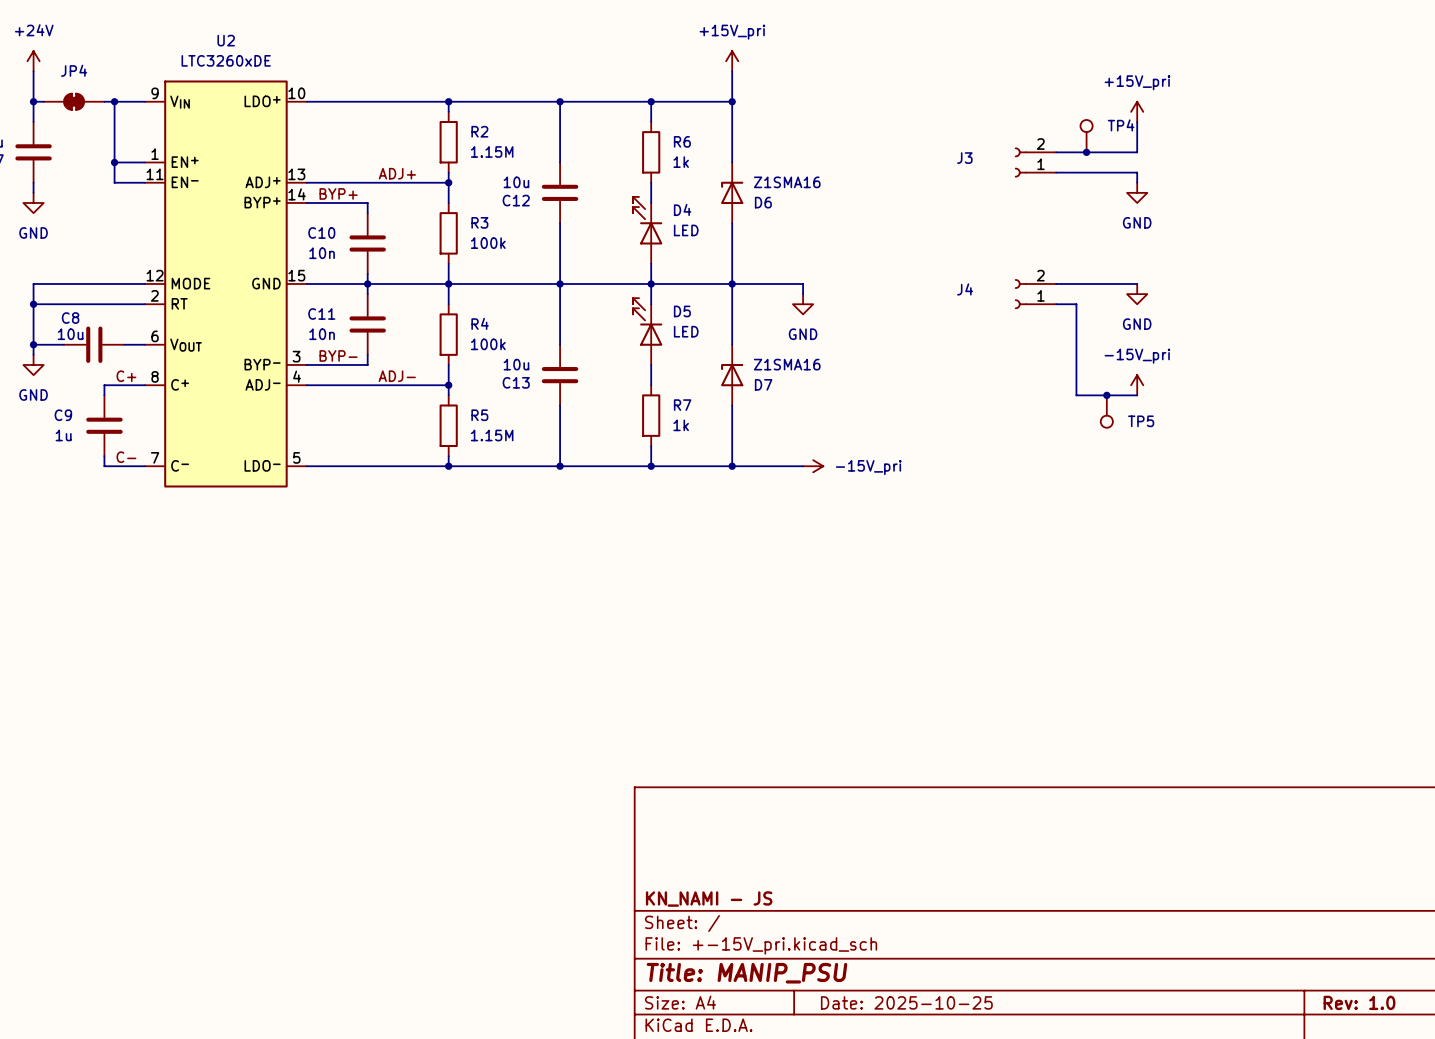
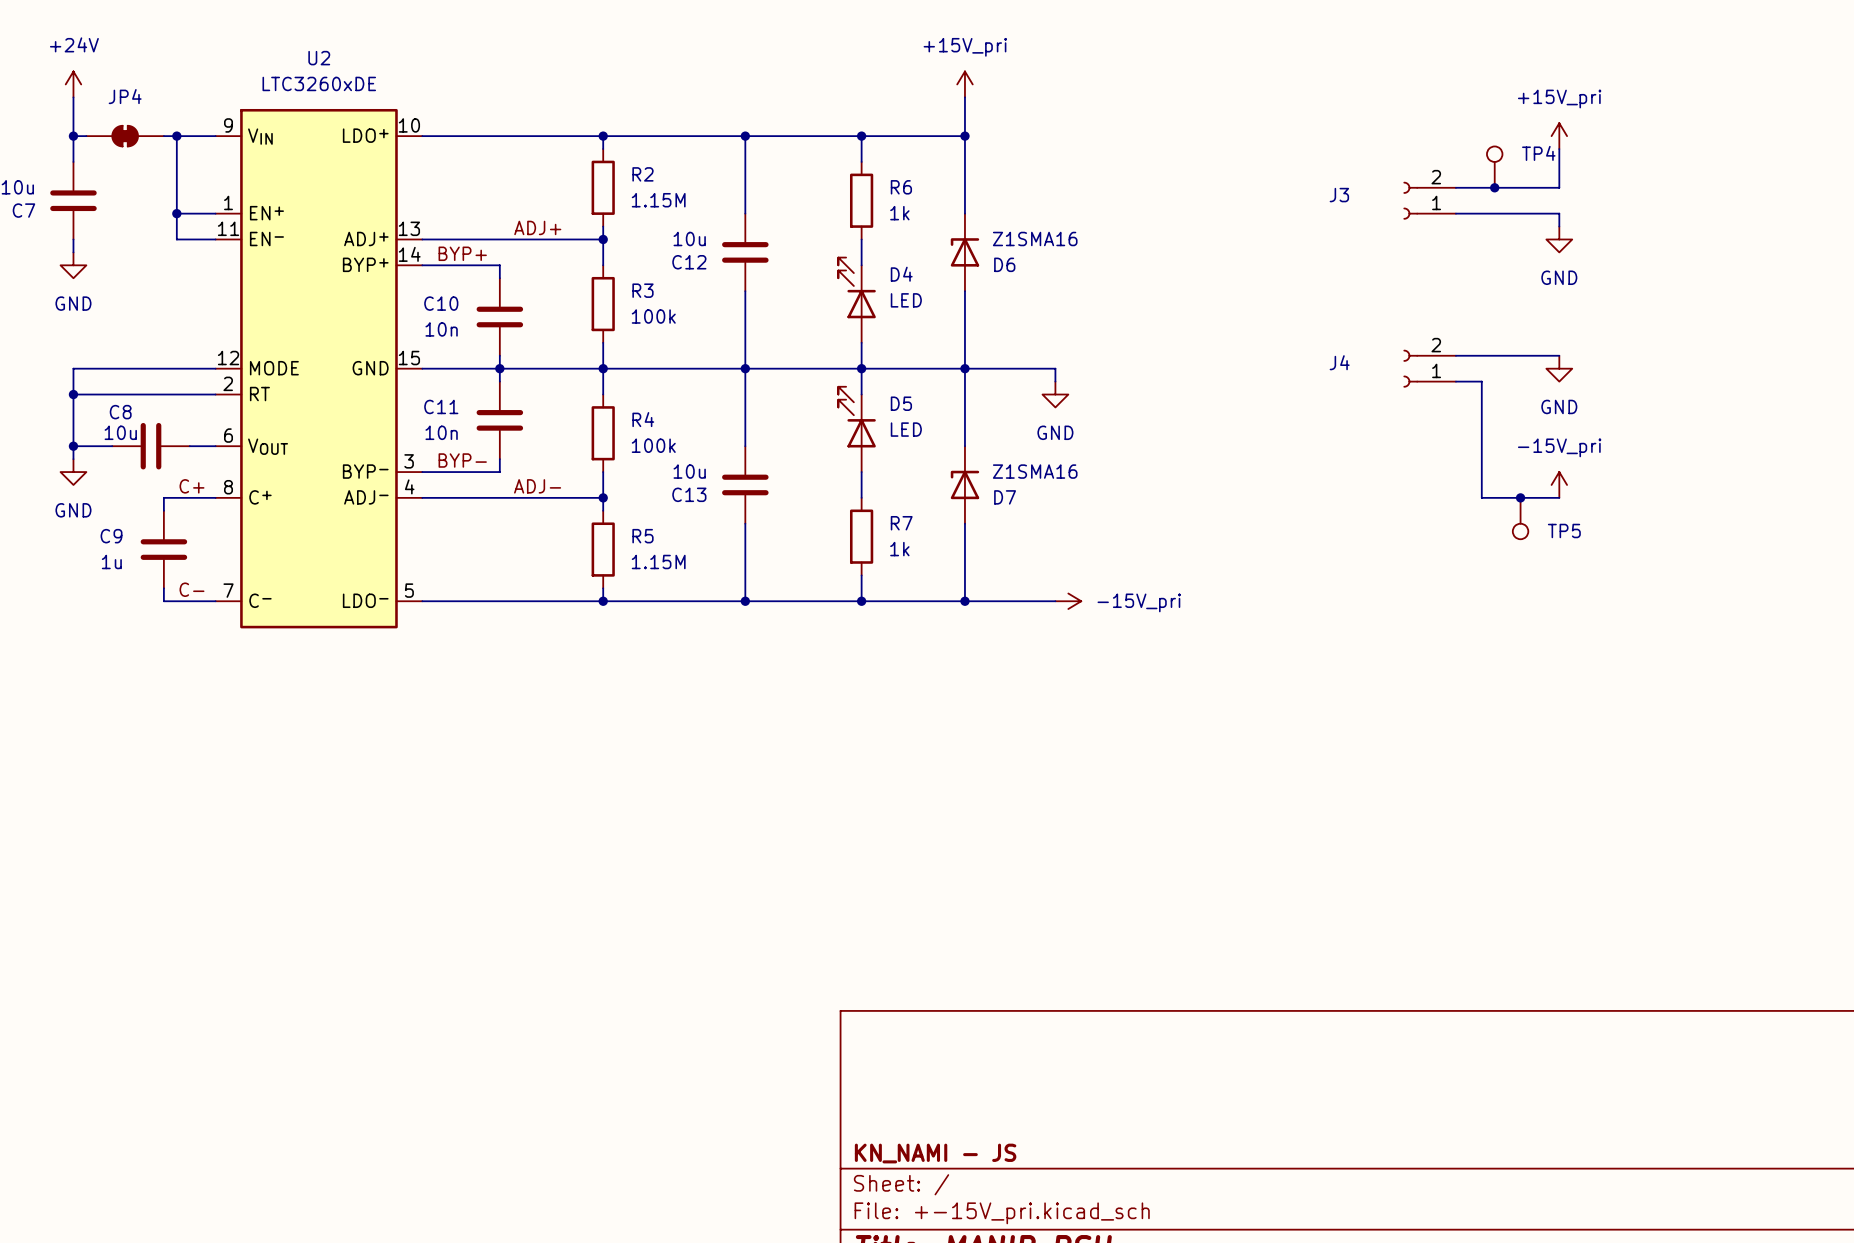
power symbol position: +15V_pri (1137, 111) -> +15V_pri (1559, 136)
wire: (1137, 121) (1137, 152) (1056, 152) -> (1559, 149) (1559, 187) (1455, 187)
TP4 position: (1086, 136) -> (1494, 167)
junction: none -> (1494, 187)
junction: (1086, 152) -> none
J3 position: (1035, 162) -> (1429, 200)
wire: (1056, 172) (1137, 172) (1137, 182) -> (1455, 213) (1559, 213) (1559, 226)
power symbol: none -> GND (1559, 239)
power symbol: GND (1137, 192) -> none
wire: (1056, 283) (1137, 283) -> (1455, 355) (1559, 355)
power symbol: none -> GND (1559, 368)
J4 position: (1035, 294) -> (1429, 368)
power symbol: GND (1137, 294) -> none
wire: (1056, 304) (1076, 304) (1076, 395) (1137, 395) -> (1455, 381) (1481, 381) (1481, 497) (1559, 497)
power symbol position: -15V_pri (1137, 385) -> -15V_pri (1559, 484)
junction: none -> (1520, 497)
junction: (1106, 395) -> none
TP5 position: (1106, 411) -> (1520, 518)

